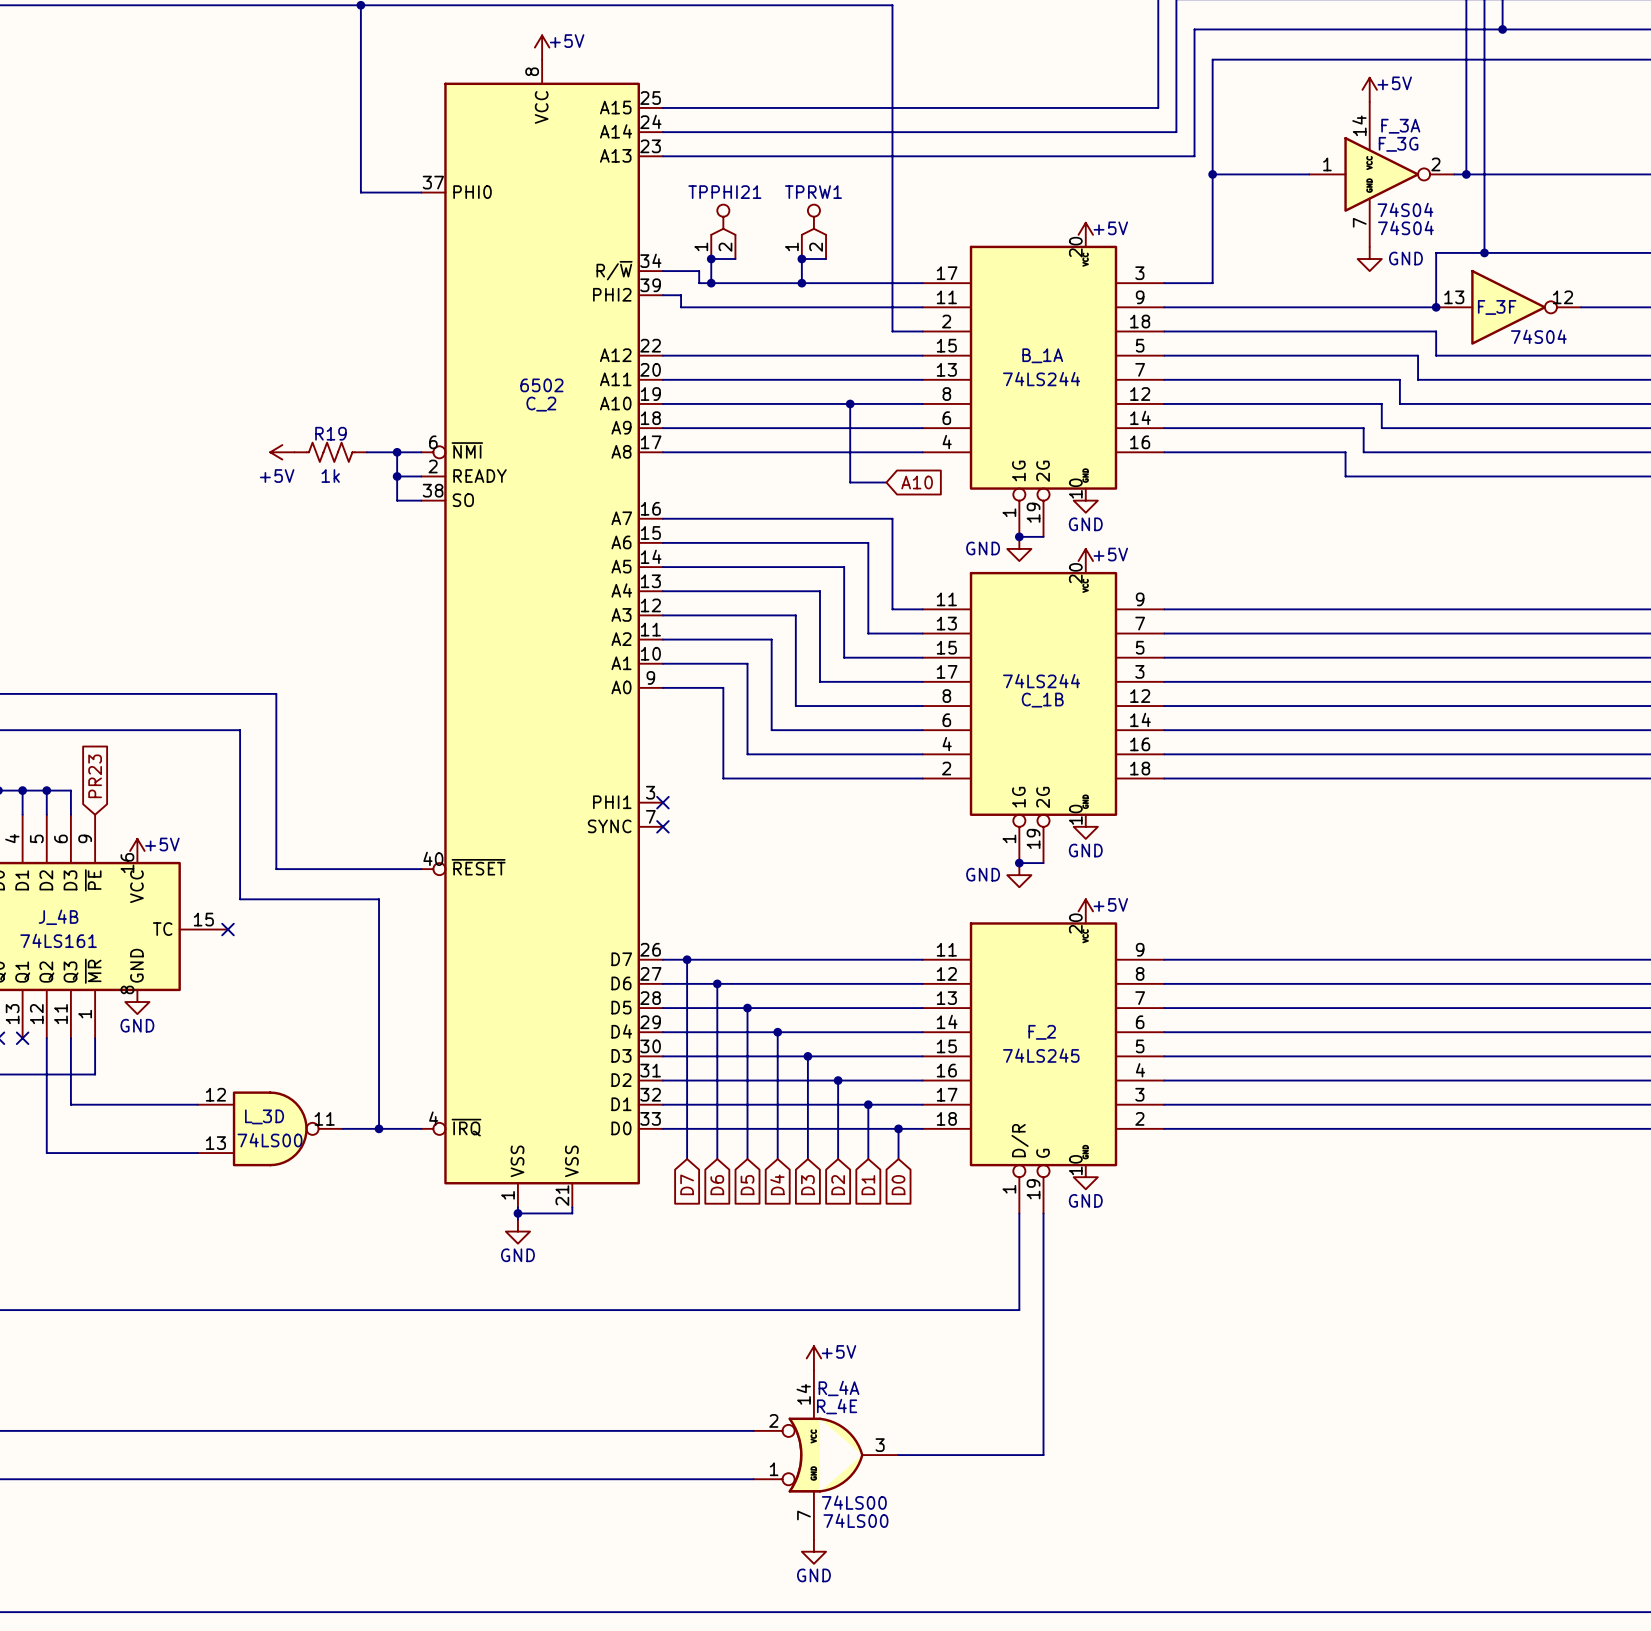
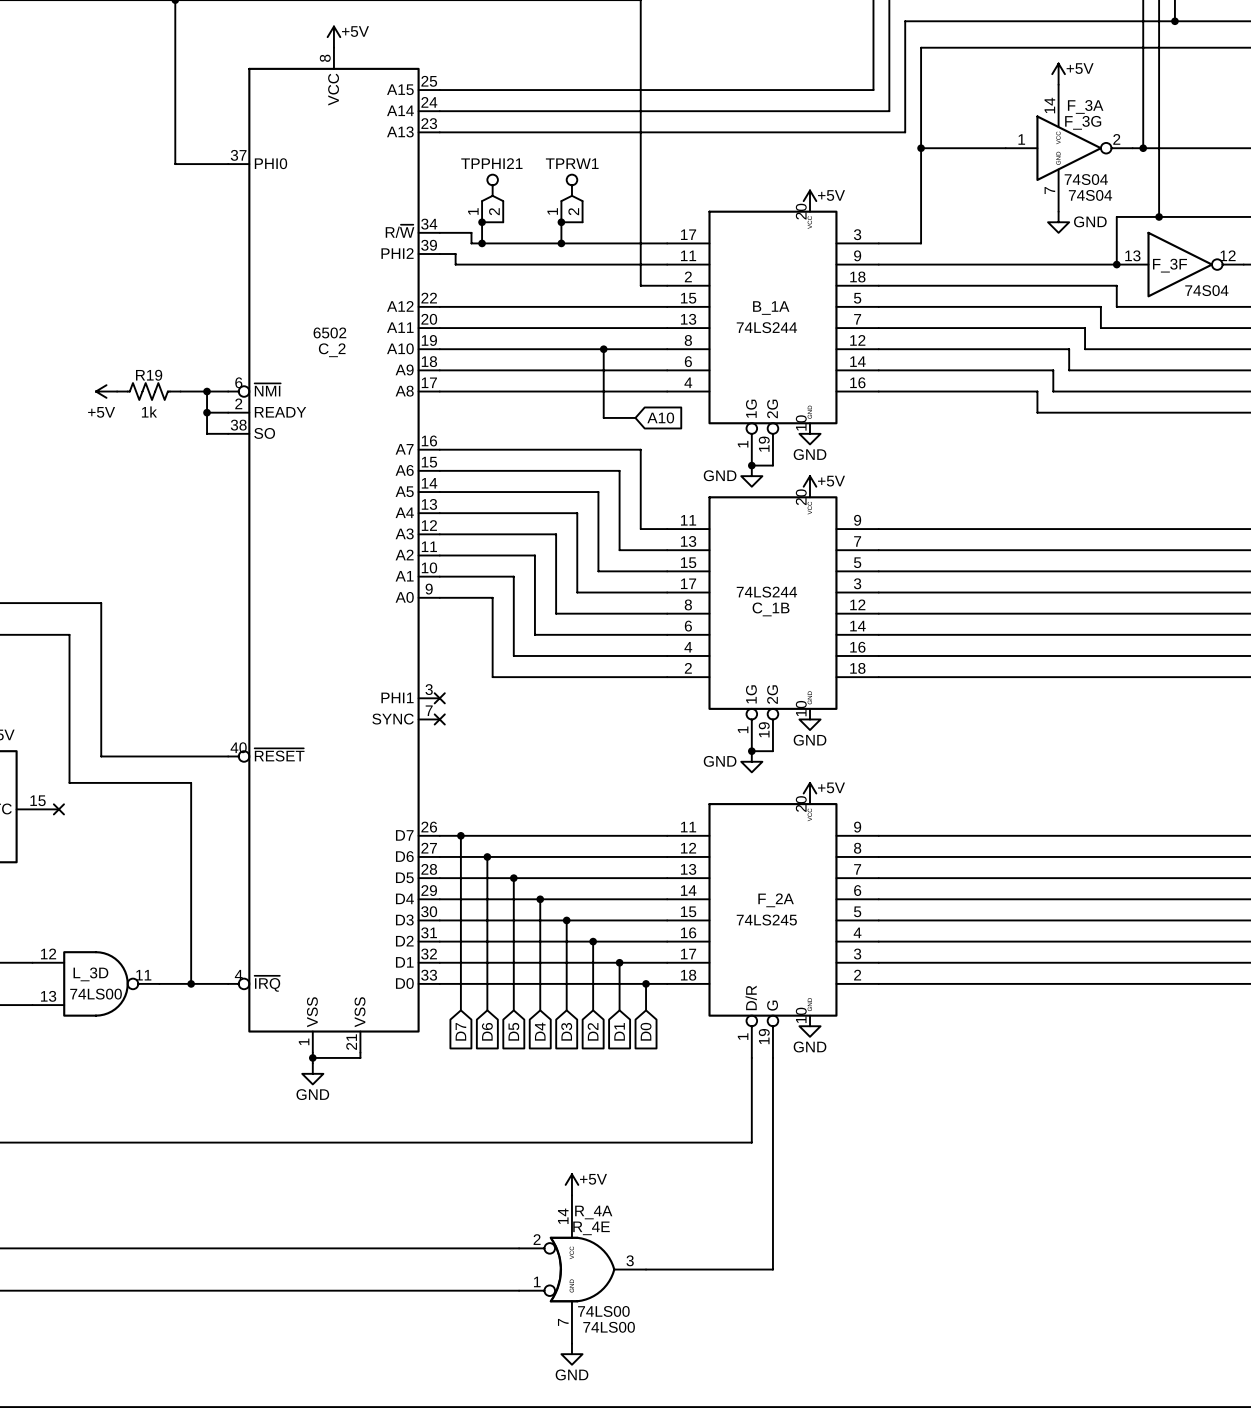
F_2 name: F_2 (1042, 1032) -> F_2A (776, 900)

